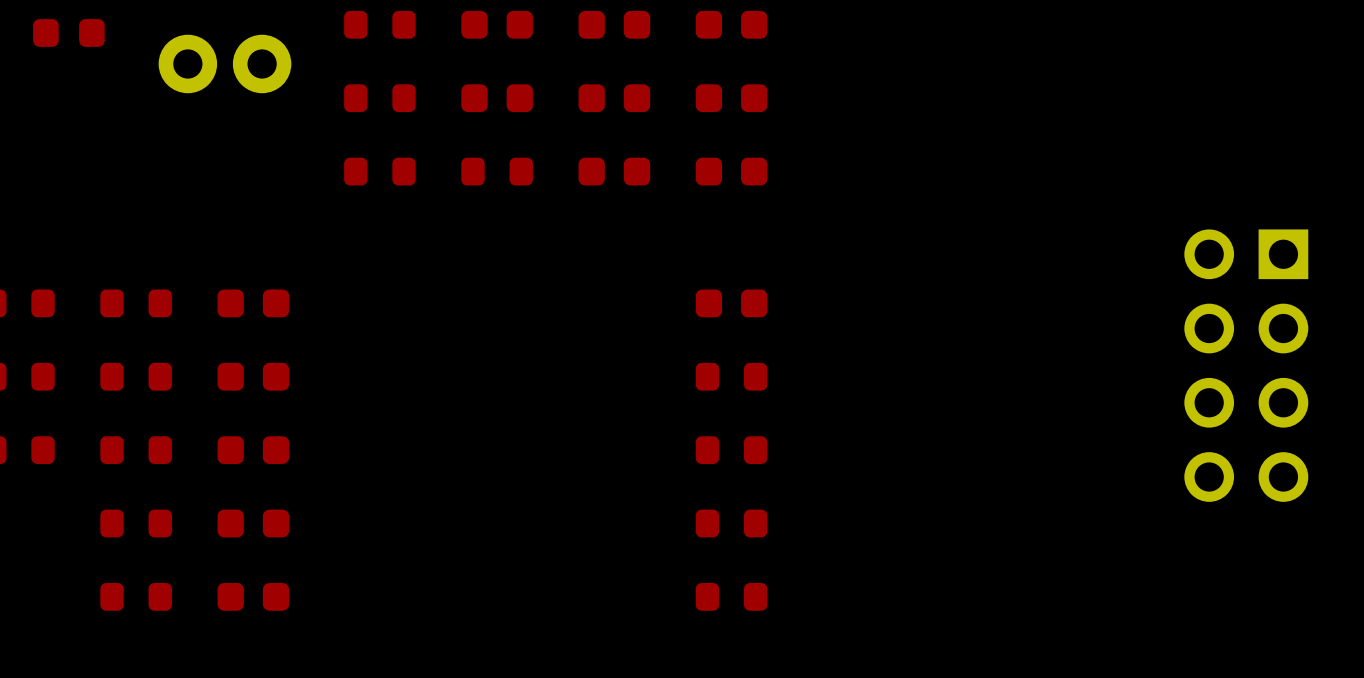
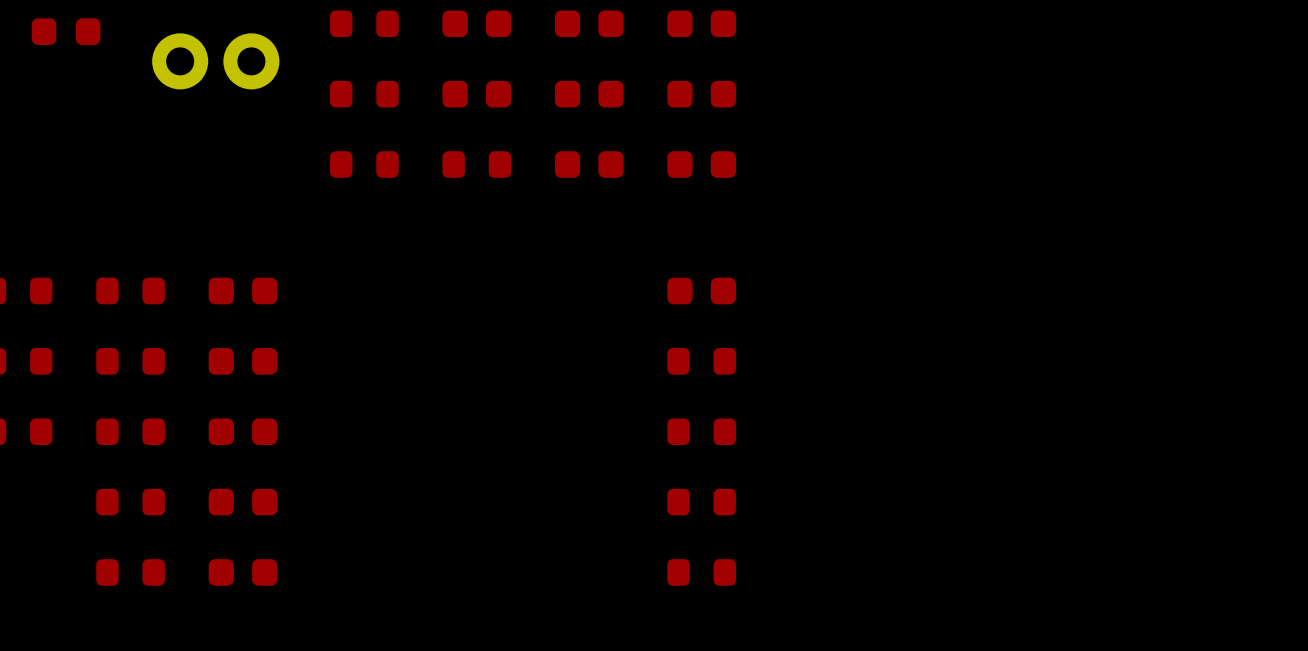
part: (1246, 365) -> none

